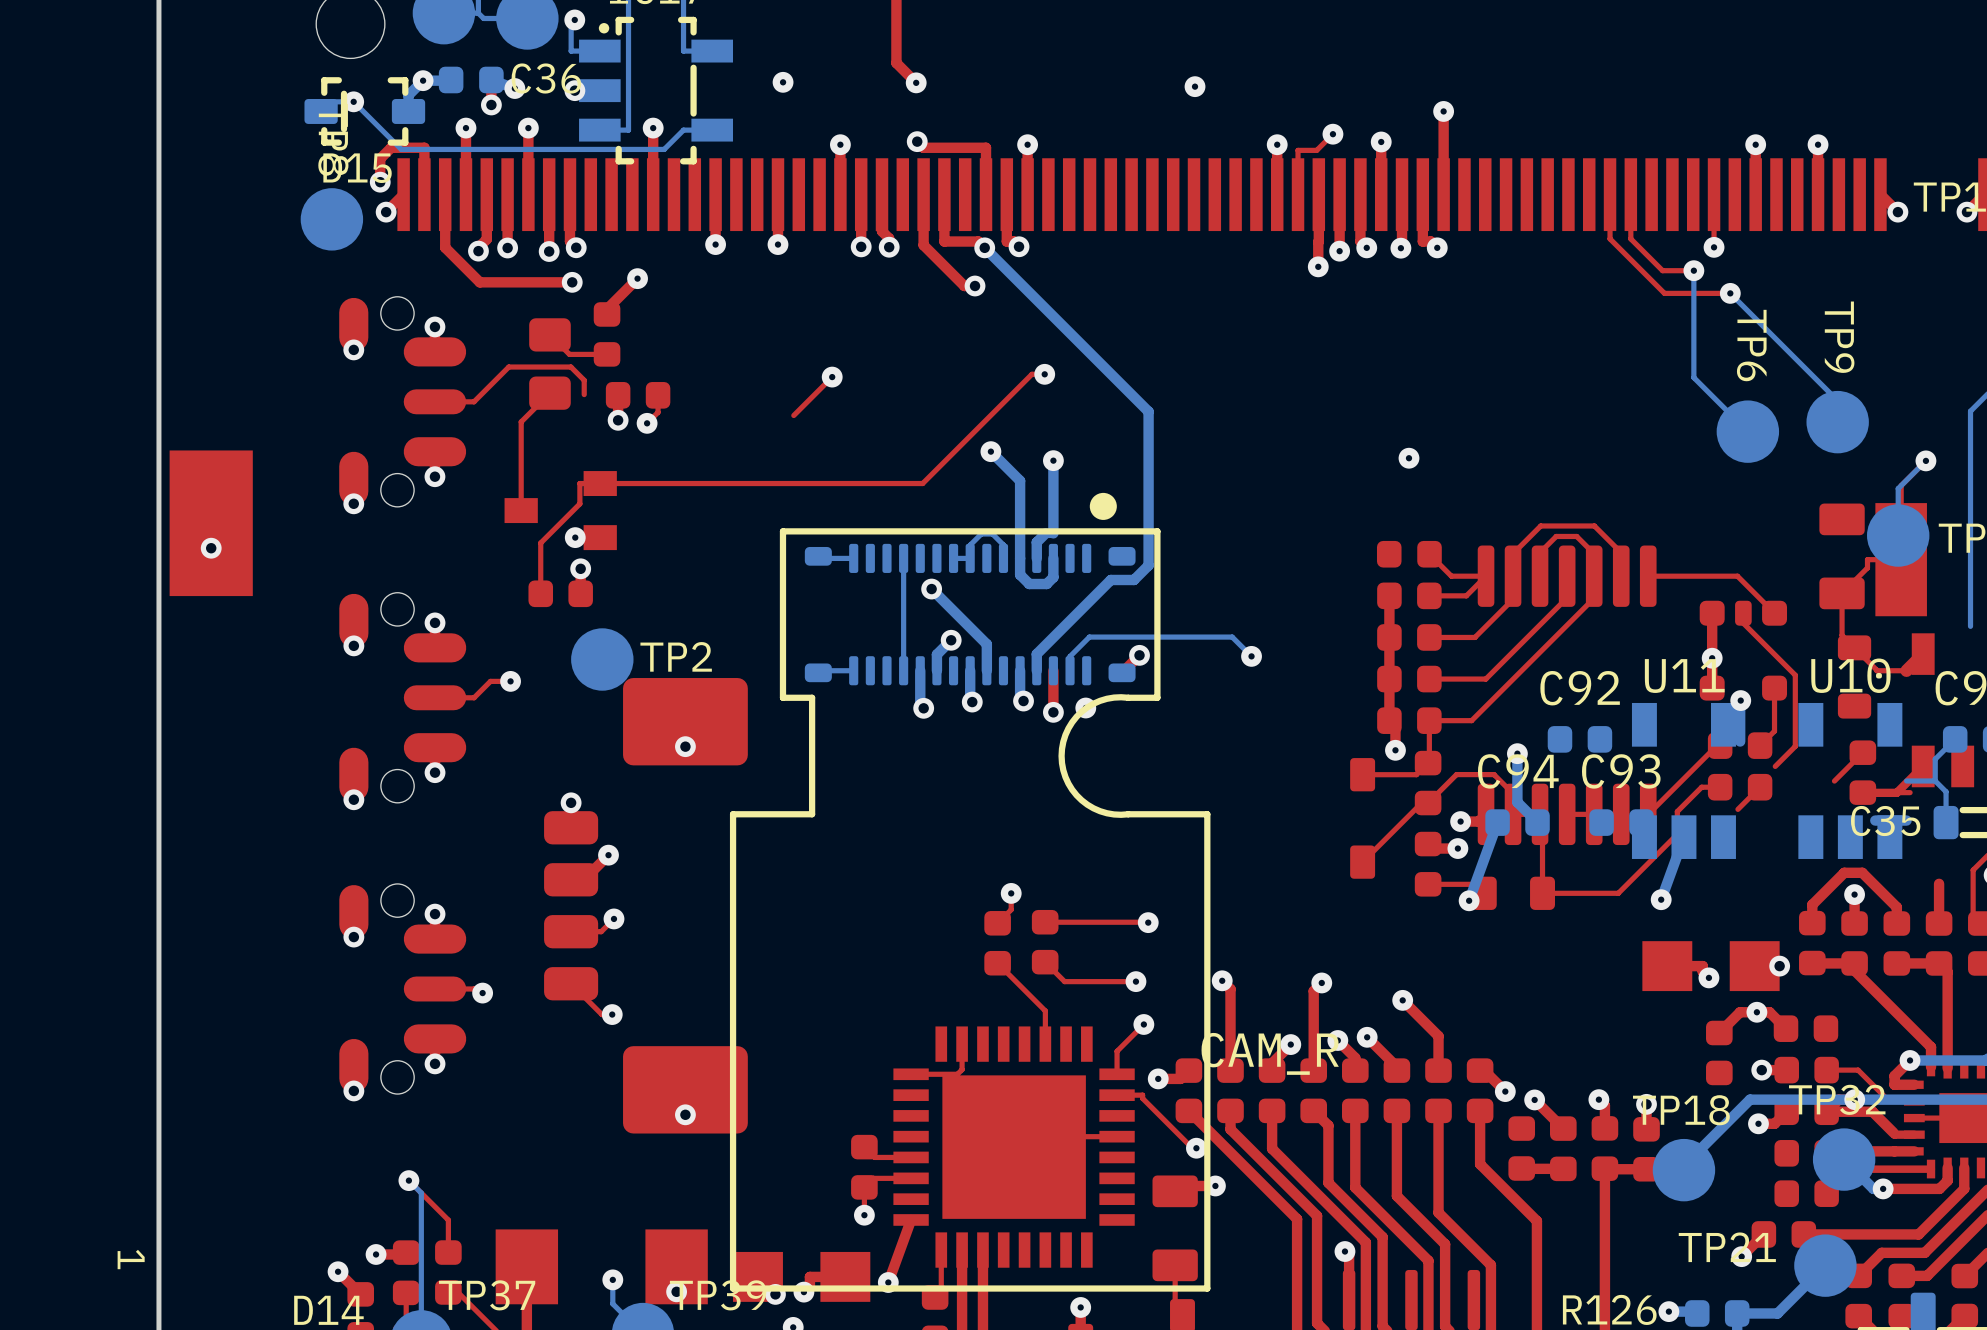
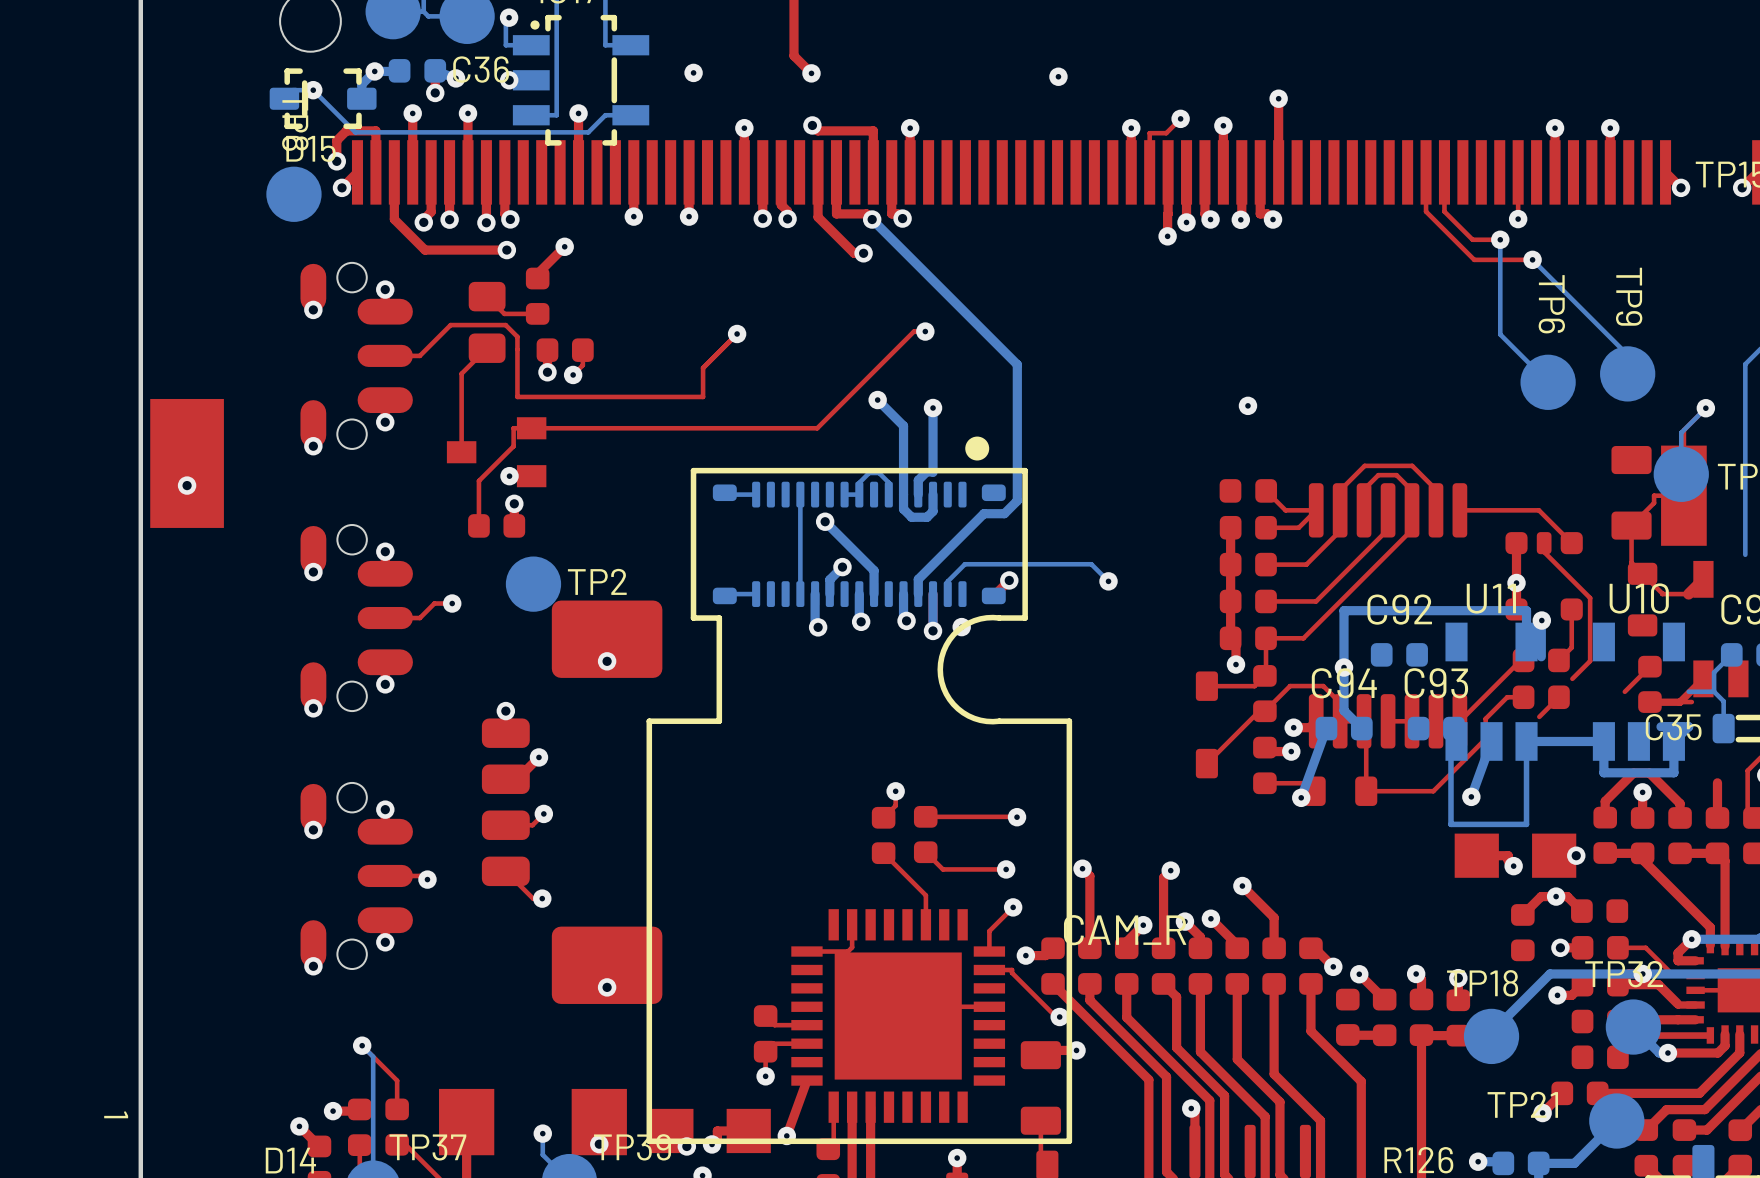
top track: none -> (737, 333) (703, 368) (703, 396) (517, 396) (517, 349)
bottom track: none -> (933, 594) (933, 630)
bottom track: none -> (1541, 620) (1526, 641) (1526, 610) (1344, 610) (1344, 667)
bottom track: none -> (1688, 726) (1673, 741) (1673, 772) (1603, 772) (1603, 741) (1526, 741) (1526, 824) (1450, 824) (1450, 750) (1456, 741) (1453, 728)

